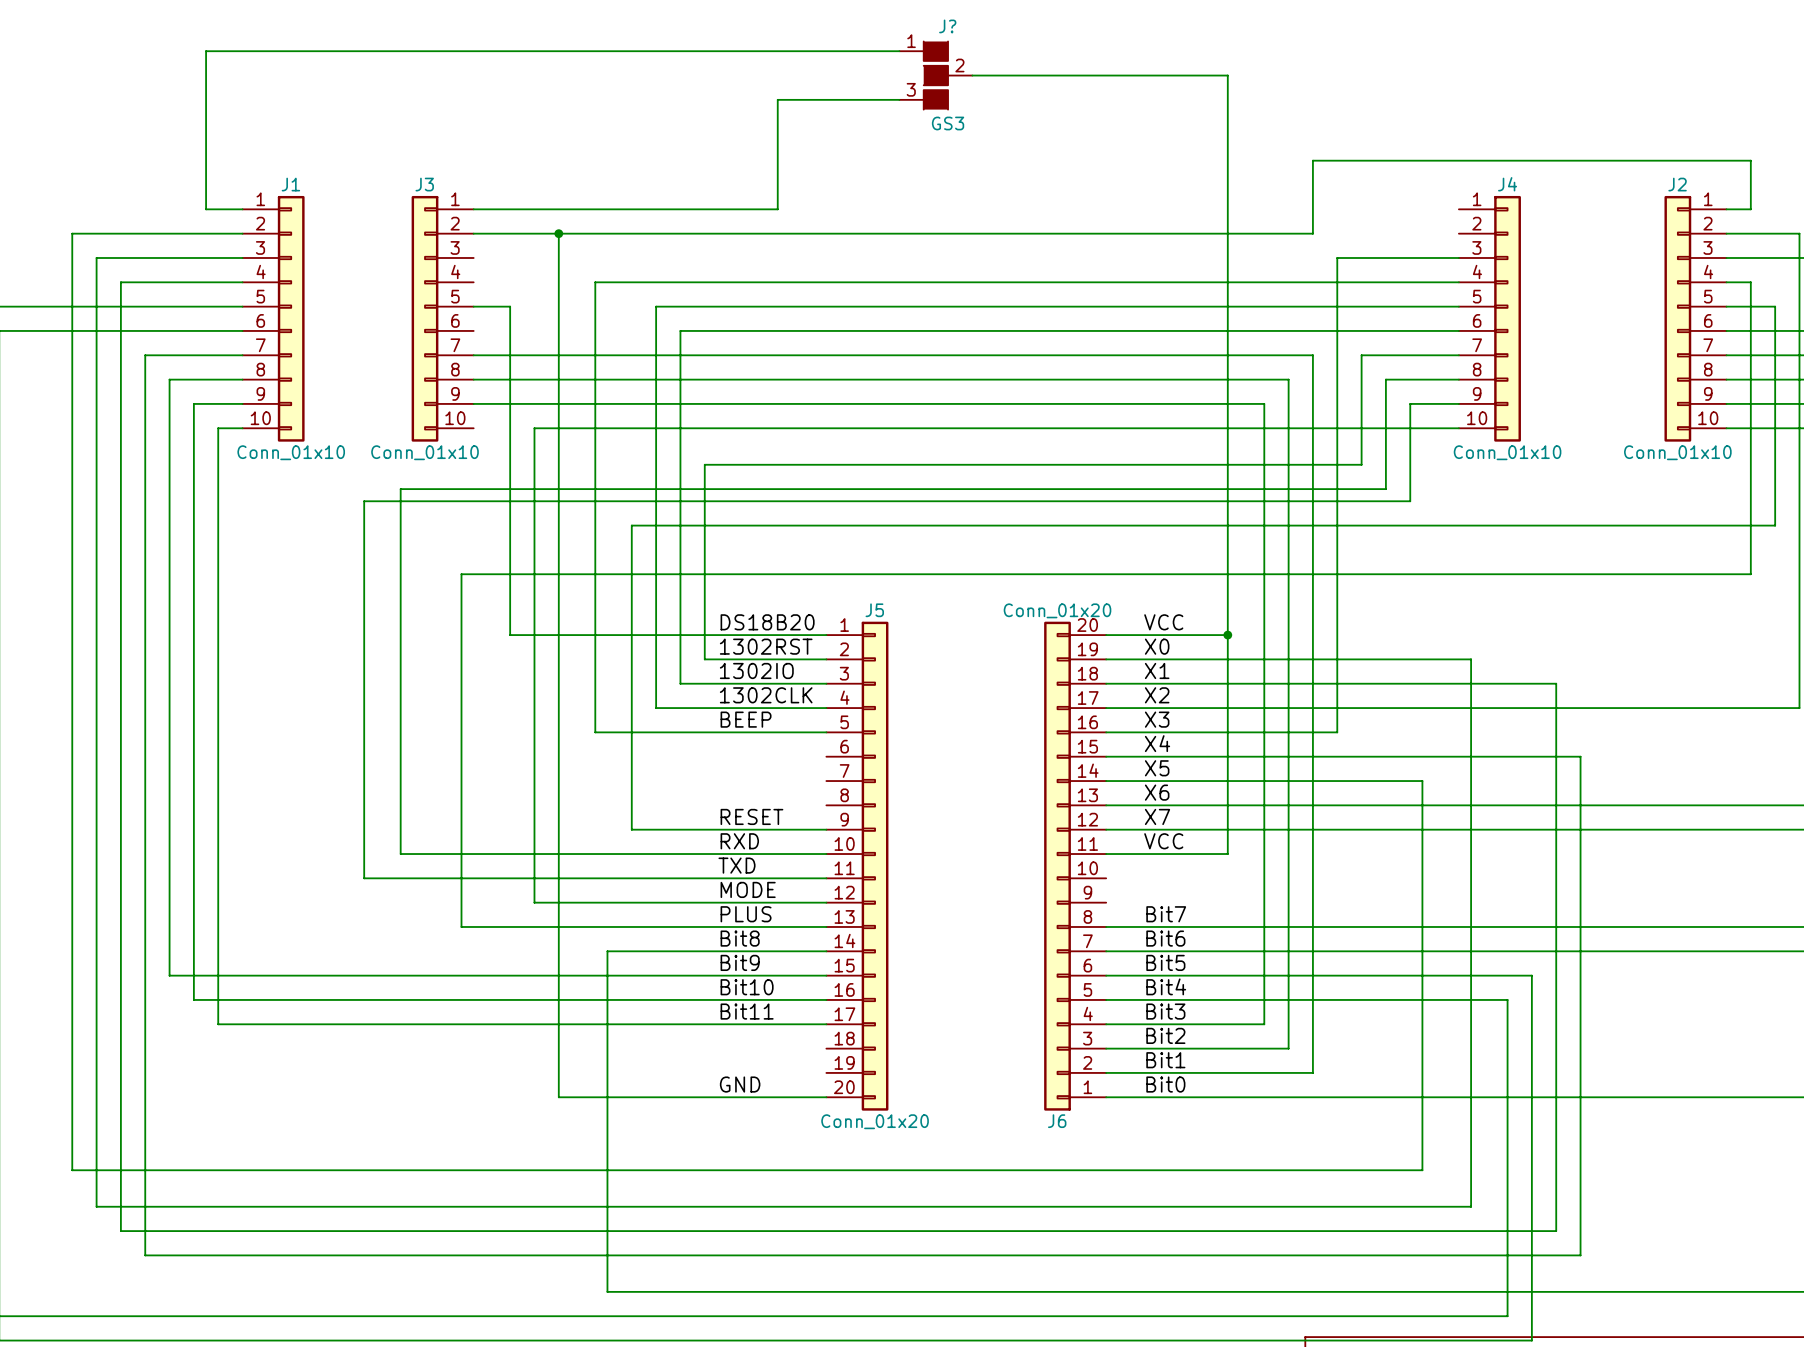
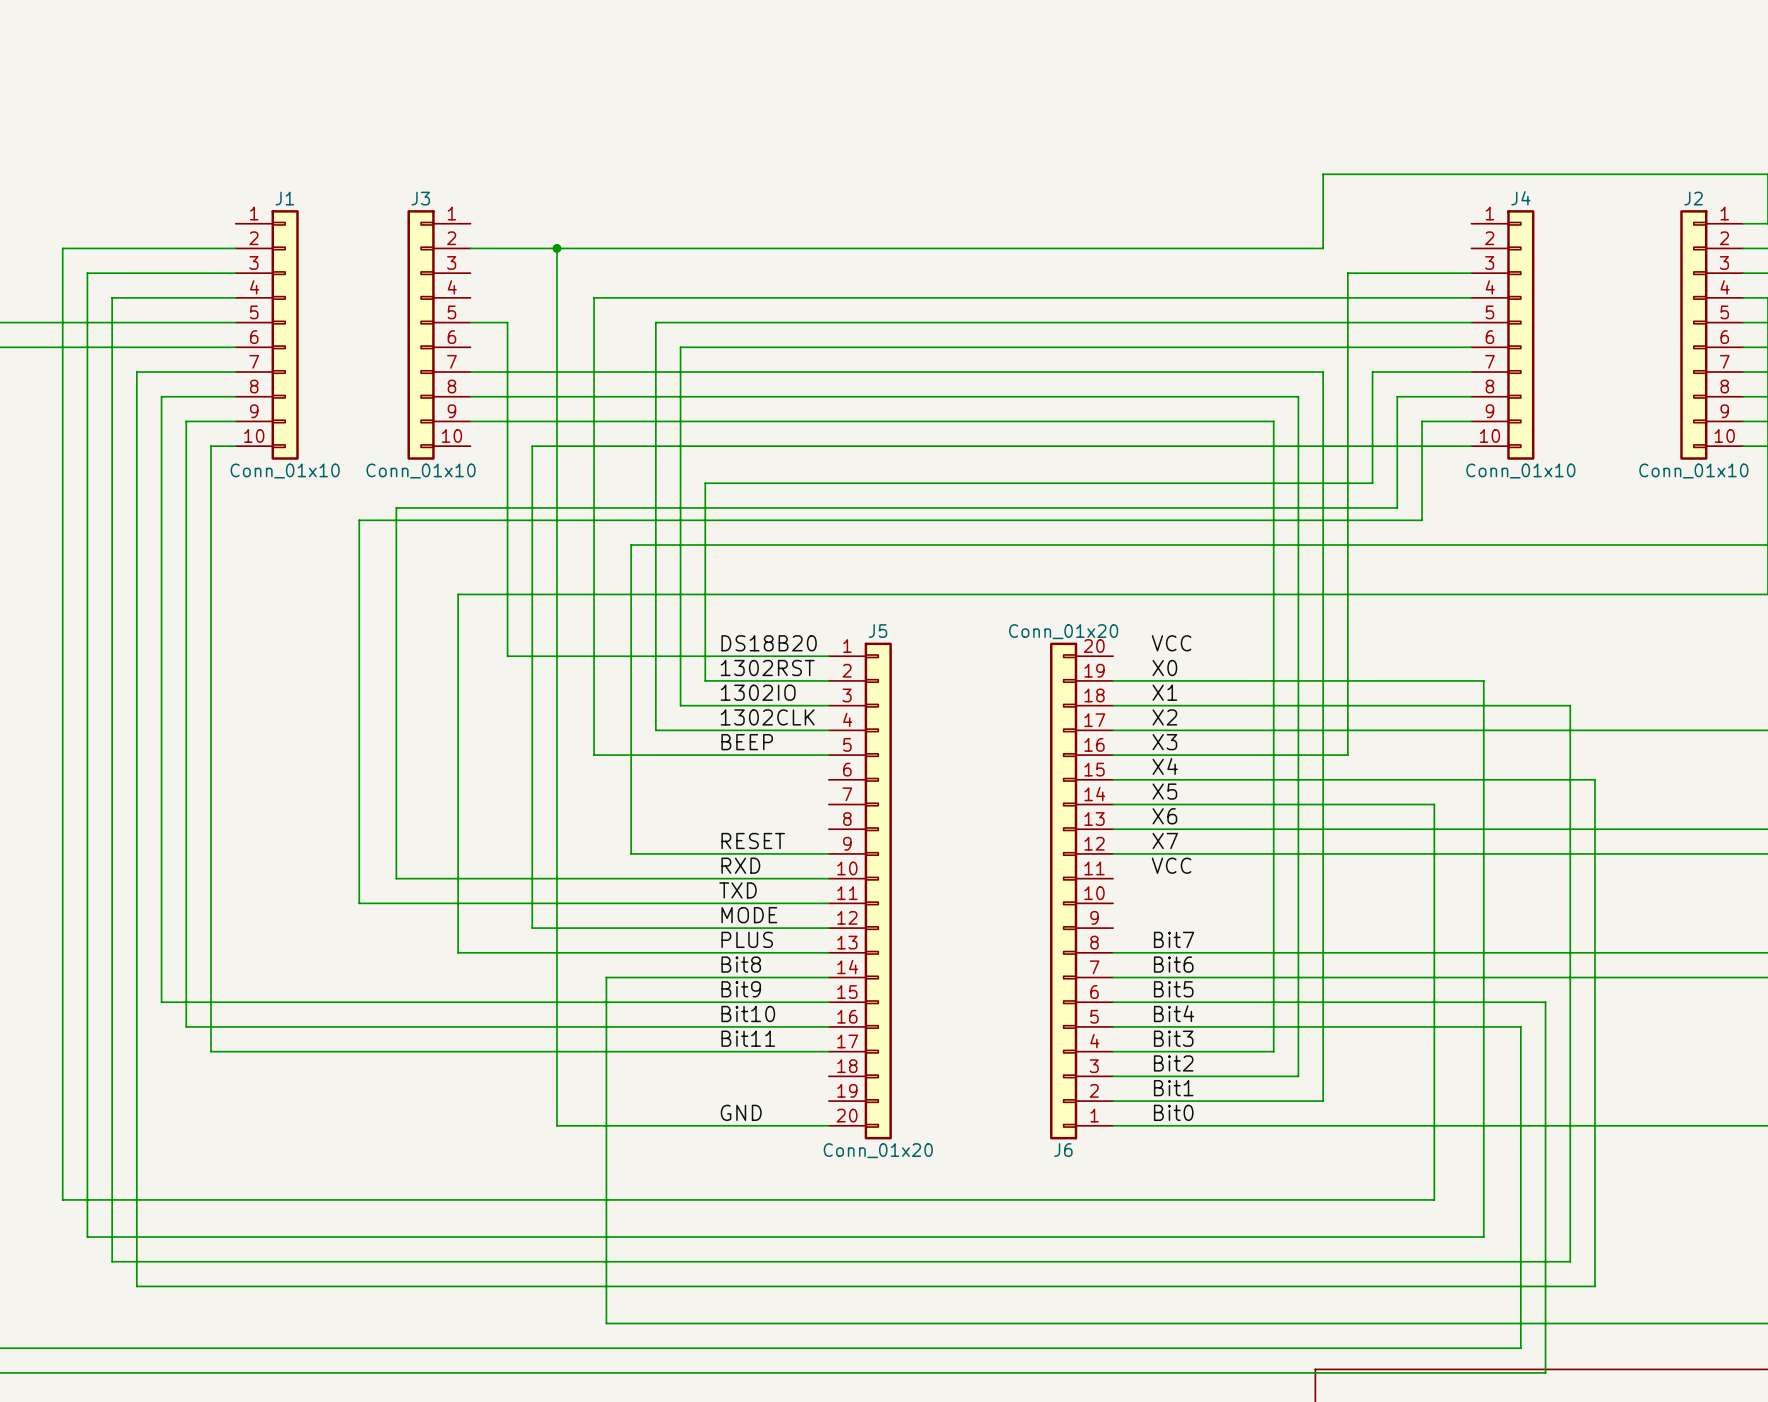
wire: (899, 51) (206, 51) (206, 209) (242, 209) -> none
J?: GS3 (935, 75) -> none
wire: (972, 75) (1227, 75) (1227, 854) (1106, 854) -> none
wire: (899, 99) (777, 99) (777, 209) (473, 209) -> none
wire: (1106, 635) (1227, 635) -> none
junction: (1227, 635) -> none

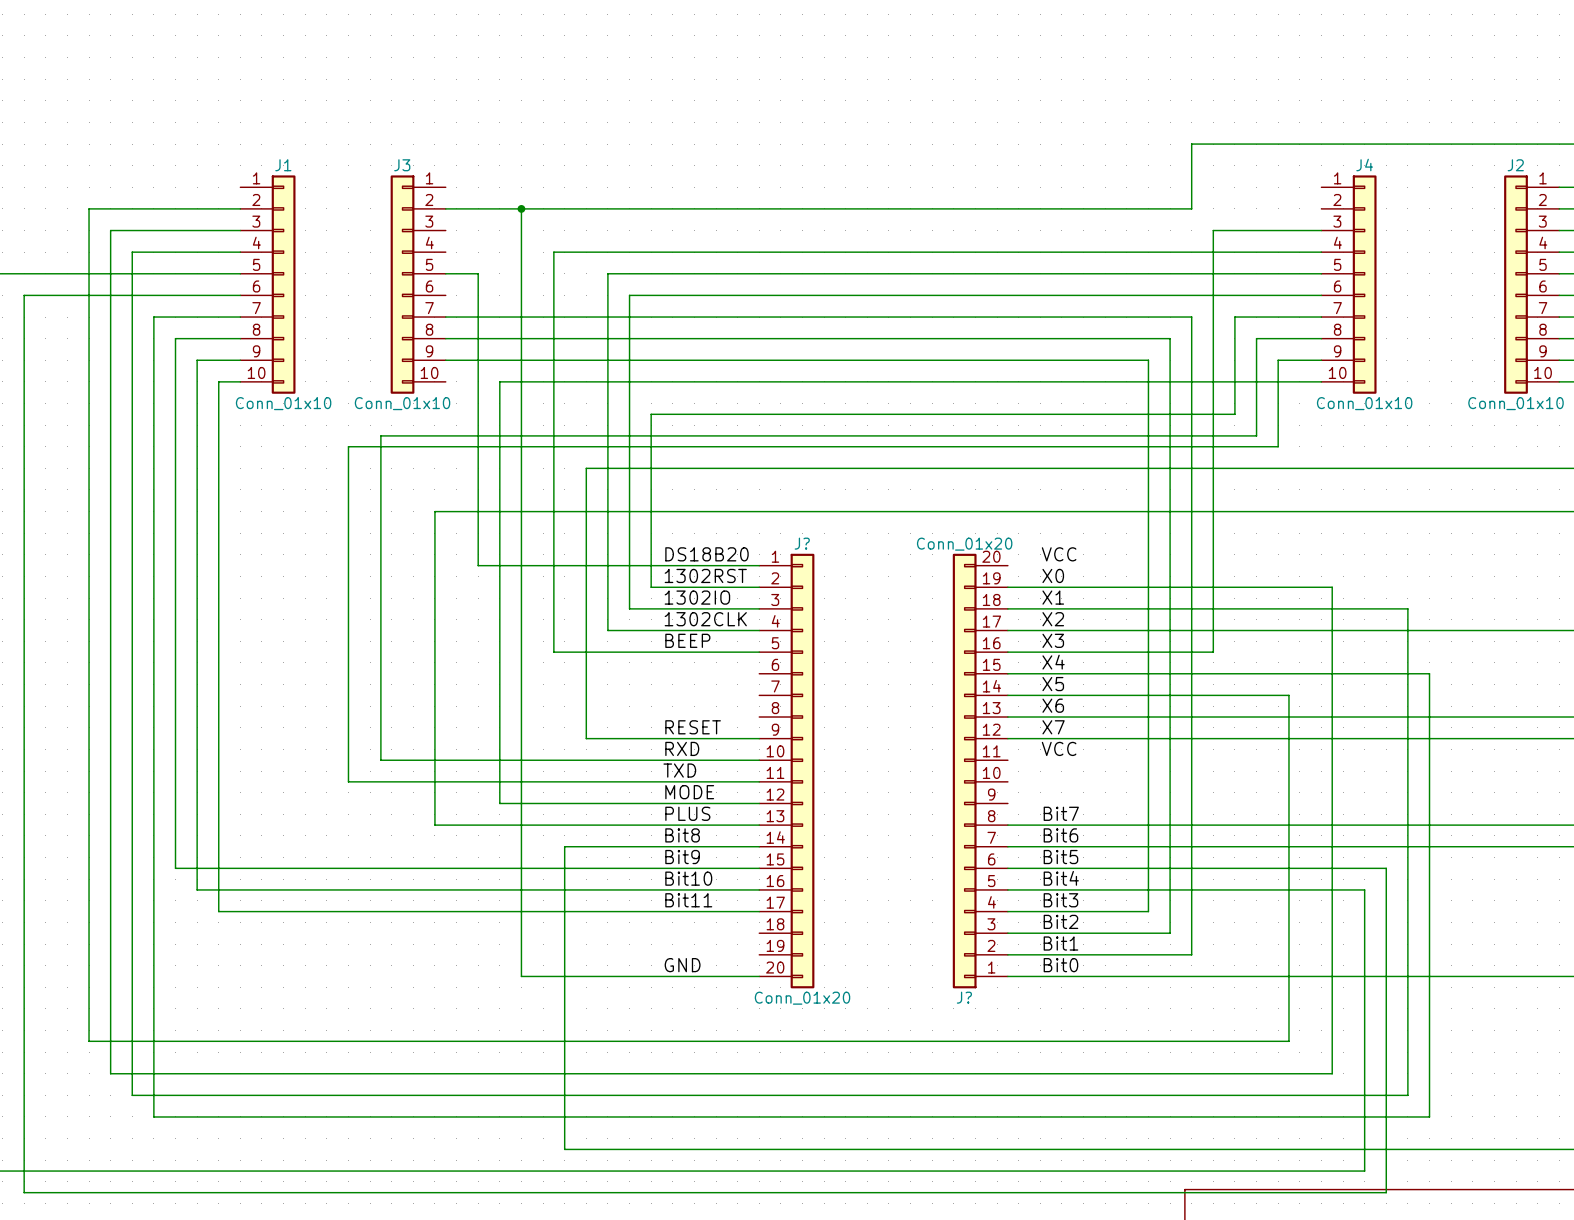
J5 name: J5 (877, 631) -> J? (802, 543)
J6 name: J6 (1063, 1150) -> J? (964, 997)

